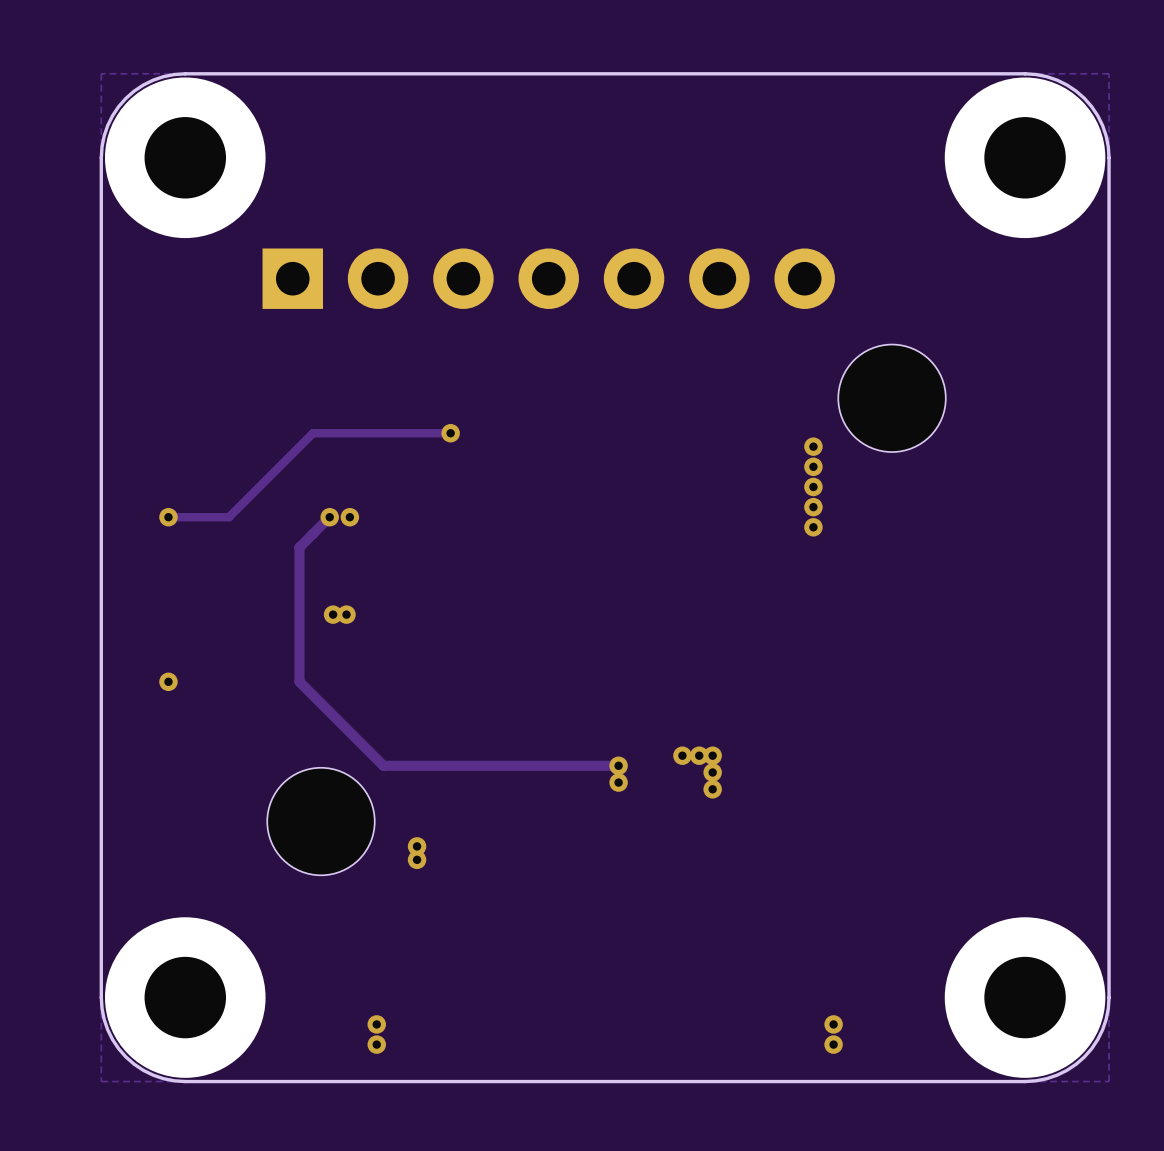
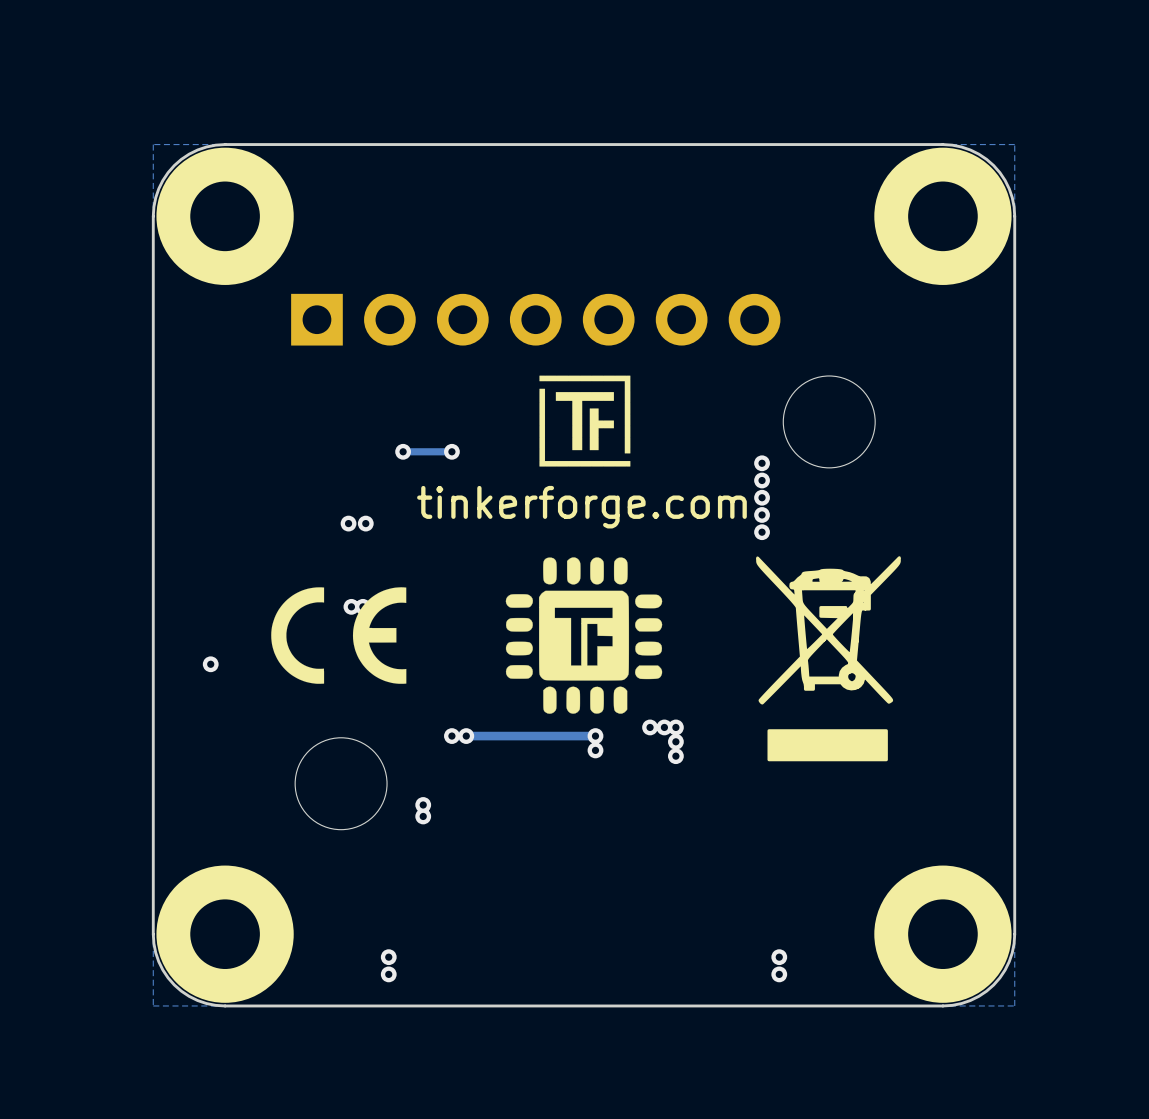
drawing: none -> [539, 375, 631, 467]
track: (393, 433) (312, 433) (228, 517) (168, 517) -> none
via: none -> (403, 451)
text: none -> tinkerforge.com (581, 507)
via: (168, 517) -> none
track: (329, 517) (299, 547) (299, 681) (383, 765) (450, 765) -> none
drawing: none -> [756, 556, 901, 762]
drawing: none -> [505, 557, 663, 714]
drawing: none -> [271, 587, 407, 684]
via: none -> (451, 736)
via: none -> (466, 736)

